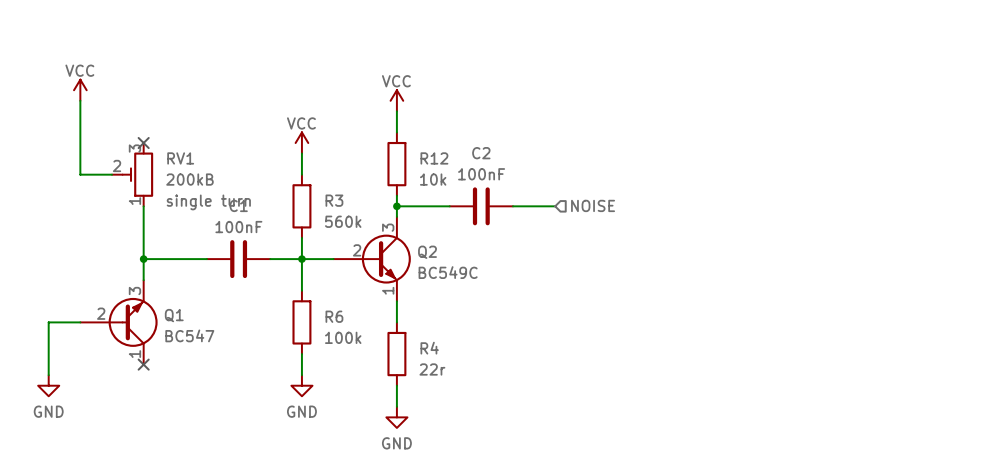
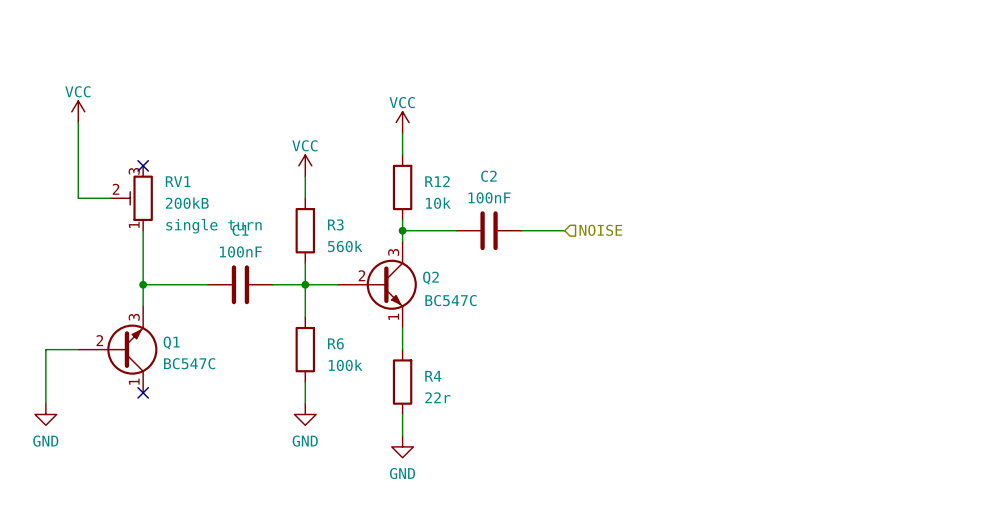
Q2 value: BC549C (448, 272) -> BC547C (451, 300)
Q1 value: BC547 (189, 335) -> BC547C (189, 363)

